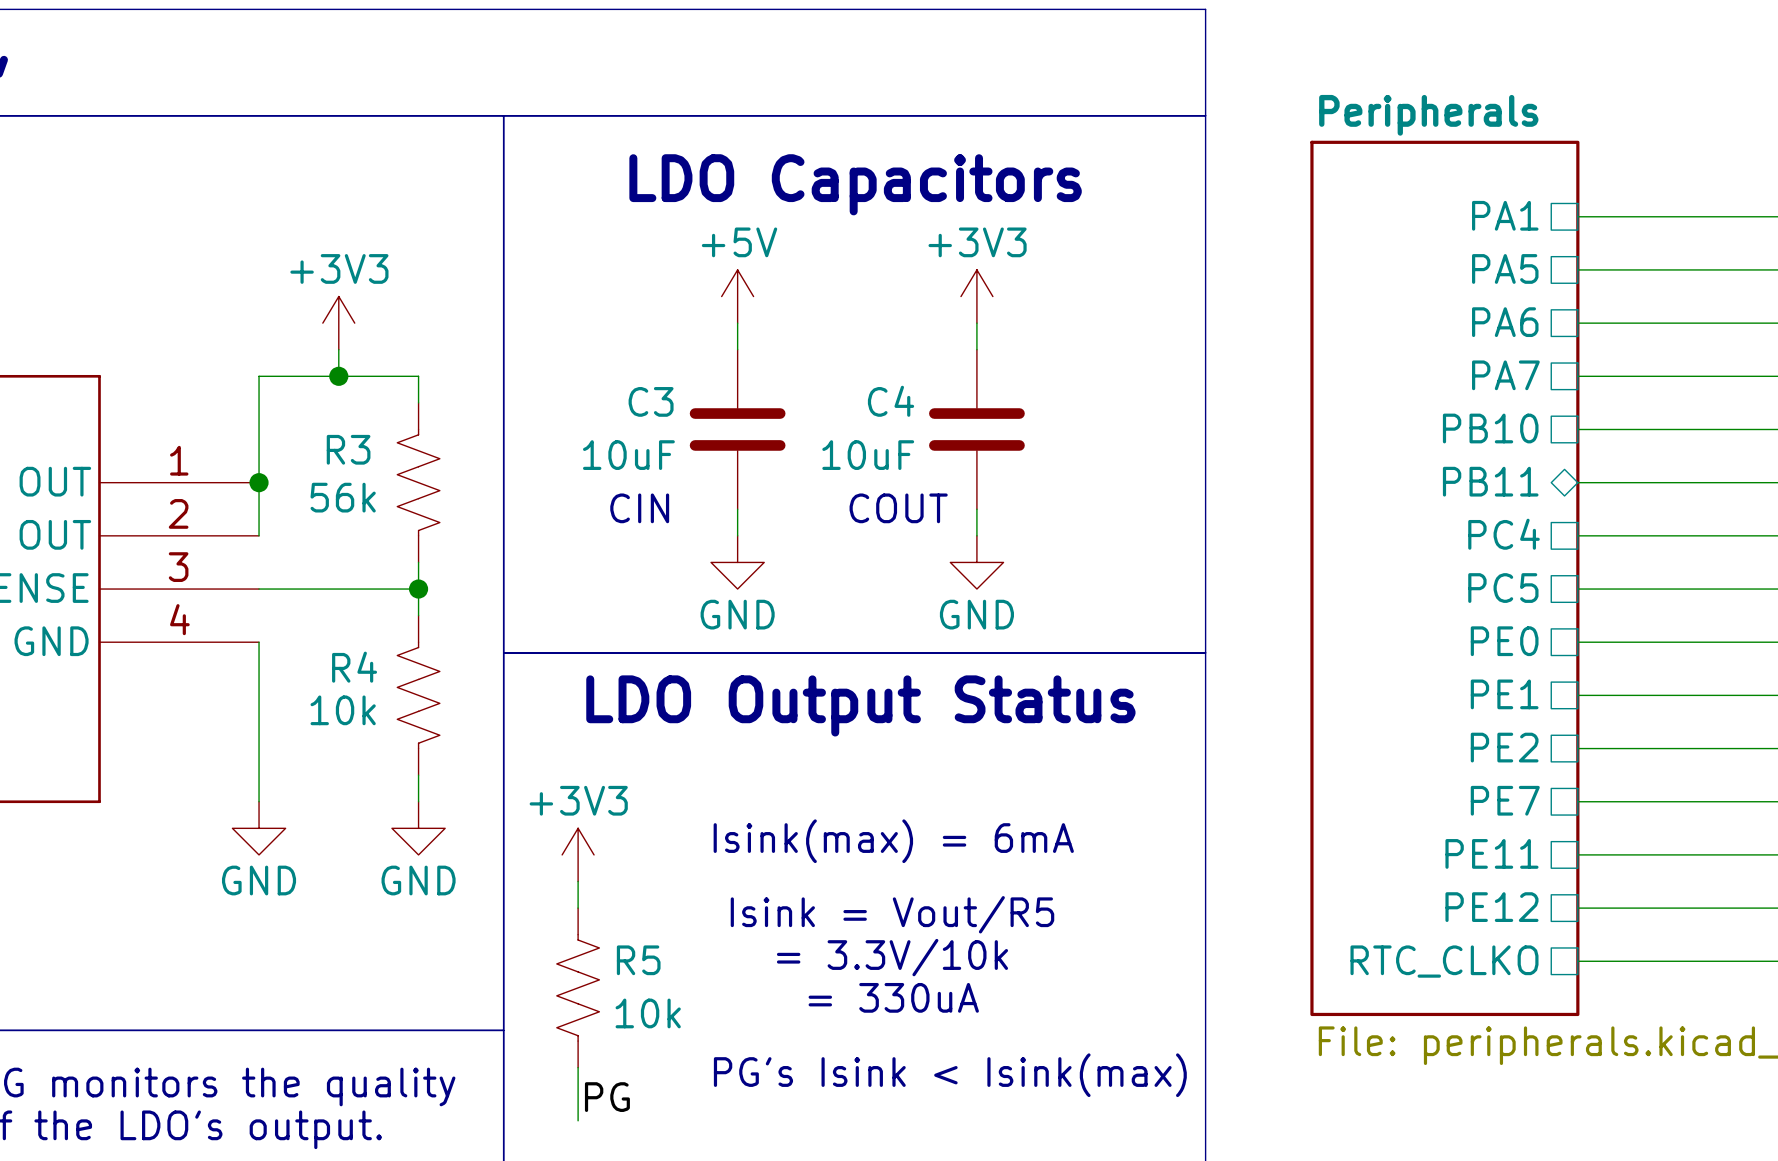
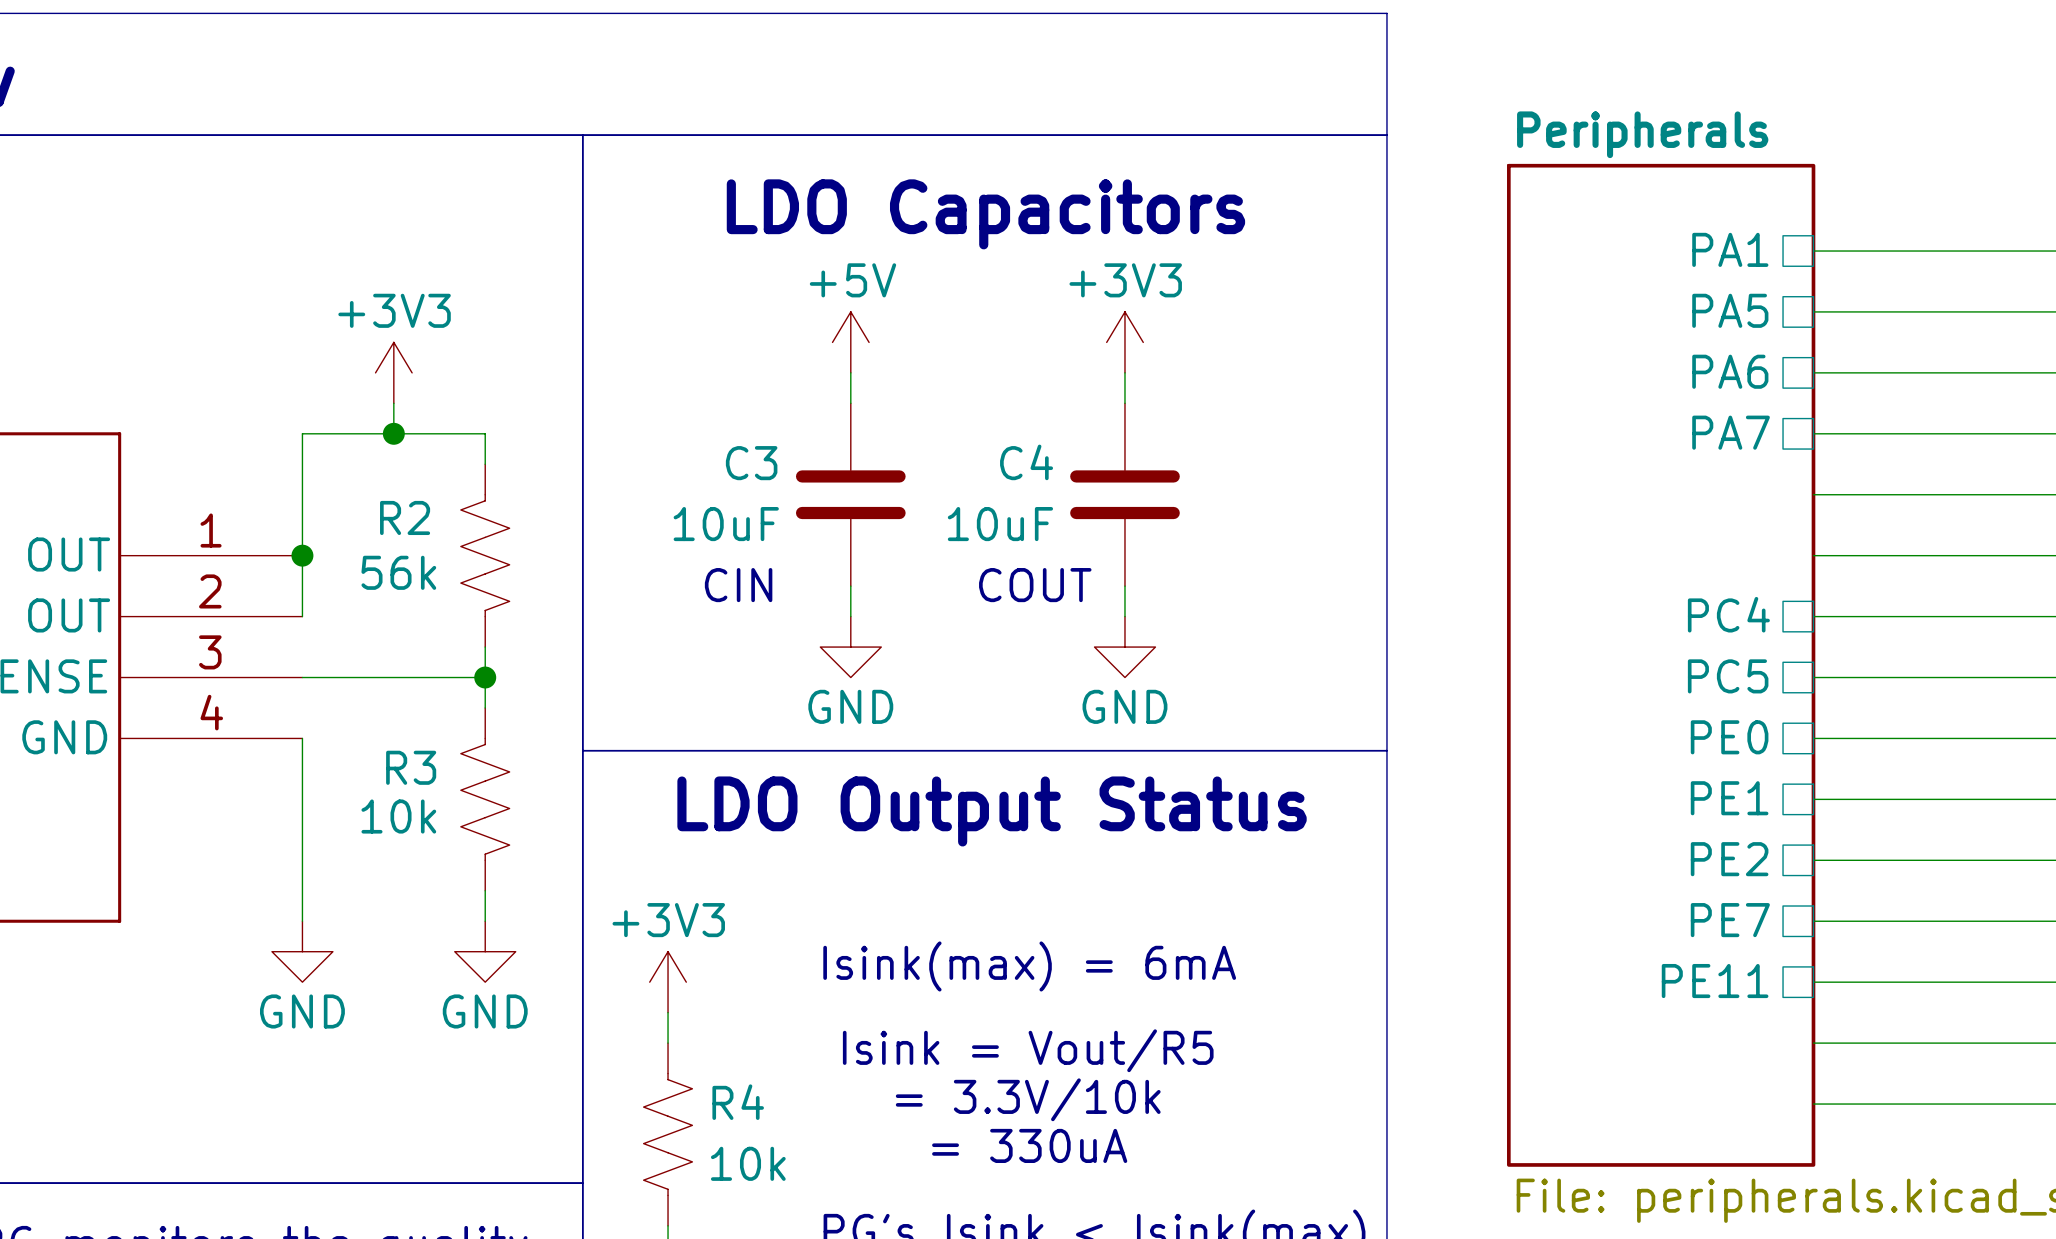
sheet pin: PB10 (1490, 428) -> none
R3 name: R3 (348, 449) -> R2 (405, 517)
sheet pin: PB11 (1490, 481) -> none
R4 name: R4 (354, 667) -> R3 (411, 767)
sheet pin: PE12 (1491, 907) -> none
R5 name: R5 (638, 960) -> R4 (738, 1102)
sheet pin: RTC_CLKO (1444, 961) -> none

